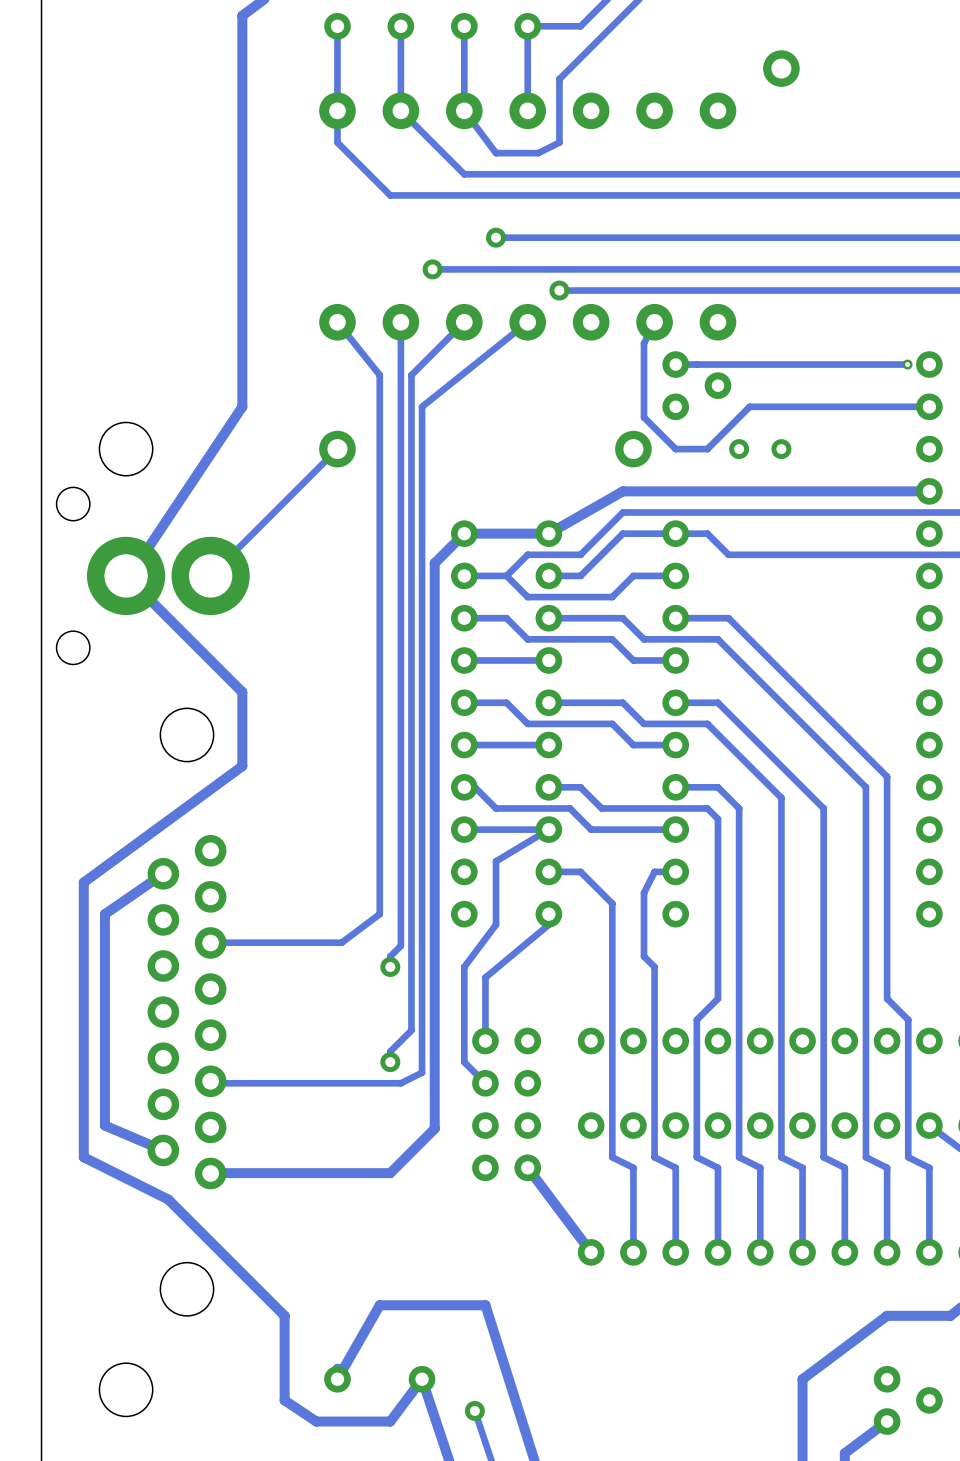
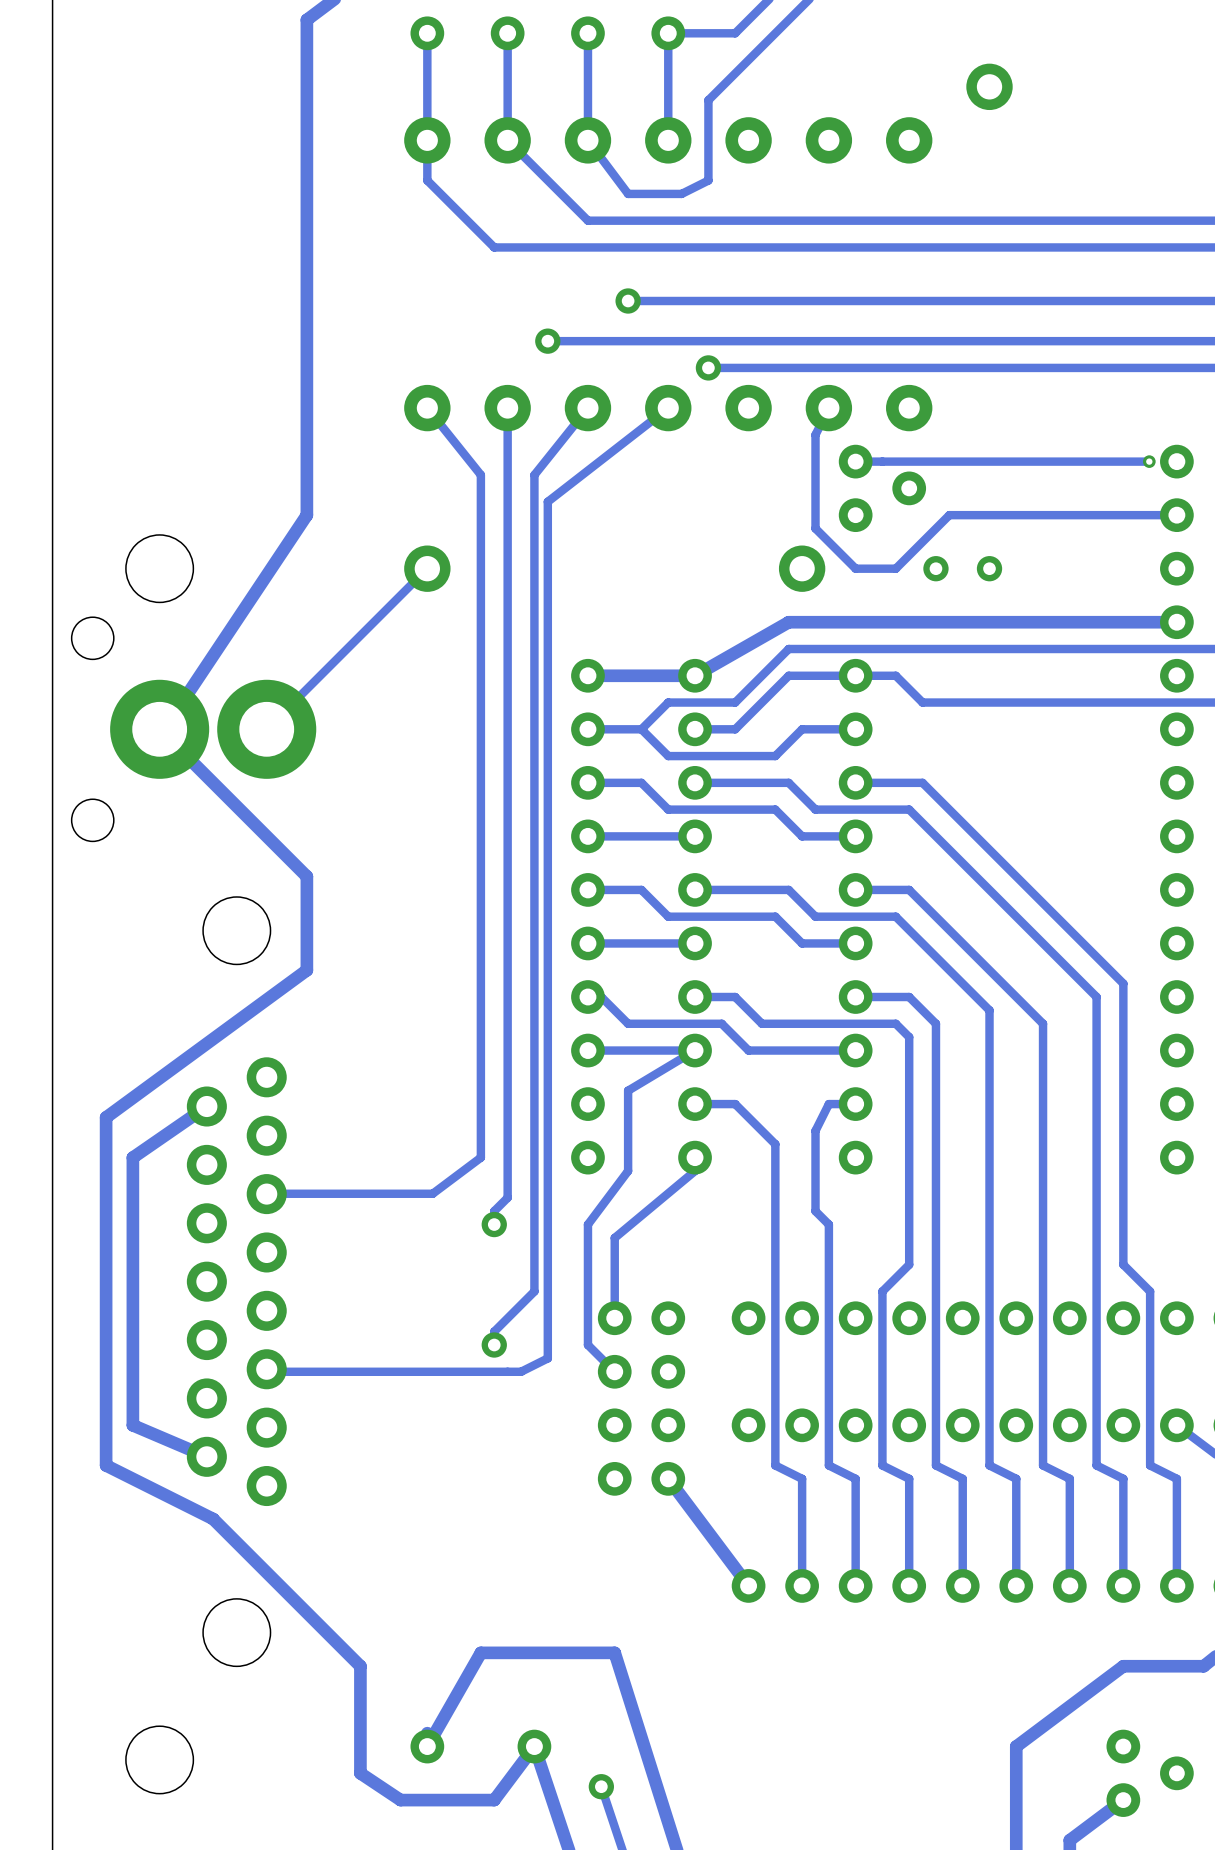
track: (464, 322) (411, 375) (411, 1030) -> none
track: (527, 322) (422, 406) -> (587, 408) (534, 475) (534, 515)
track: none -> (668, 408) (547, 501) (547, 1358) (521, 1371) (507, 1371)
track: (464, 533) (434, 563) (434, 1128) (390, 1173) (210, 1173) -> none
track: (422, 1019) (422, 1072) (400, 1083) -> (534, 1291) (521, 1304)

